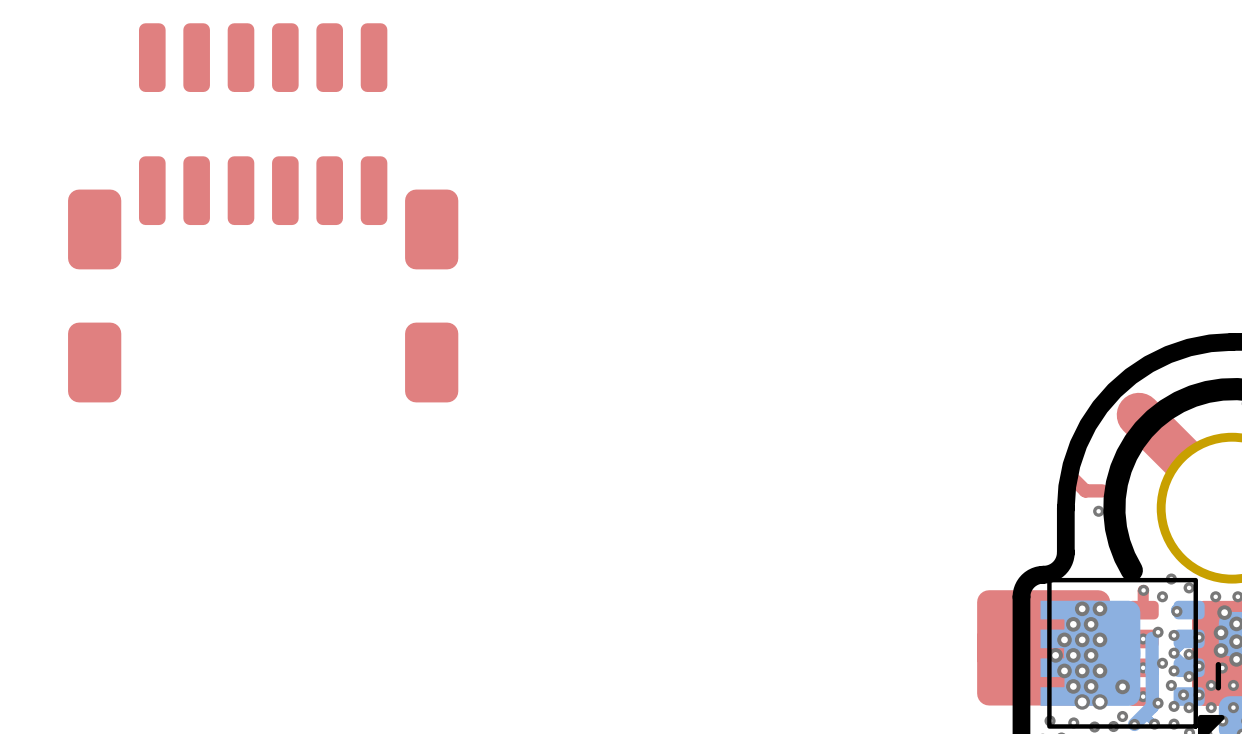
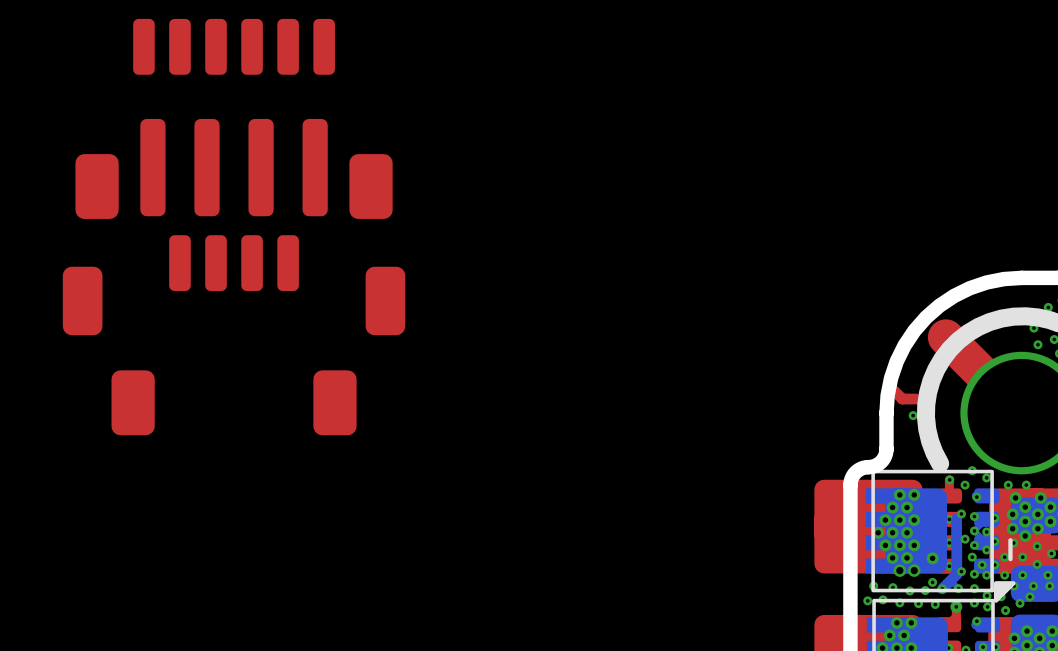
part footprint: [68, 156, 459, 403] -> [62, 118, 406, 336]
part: none -> (234, 335)

